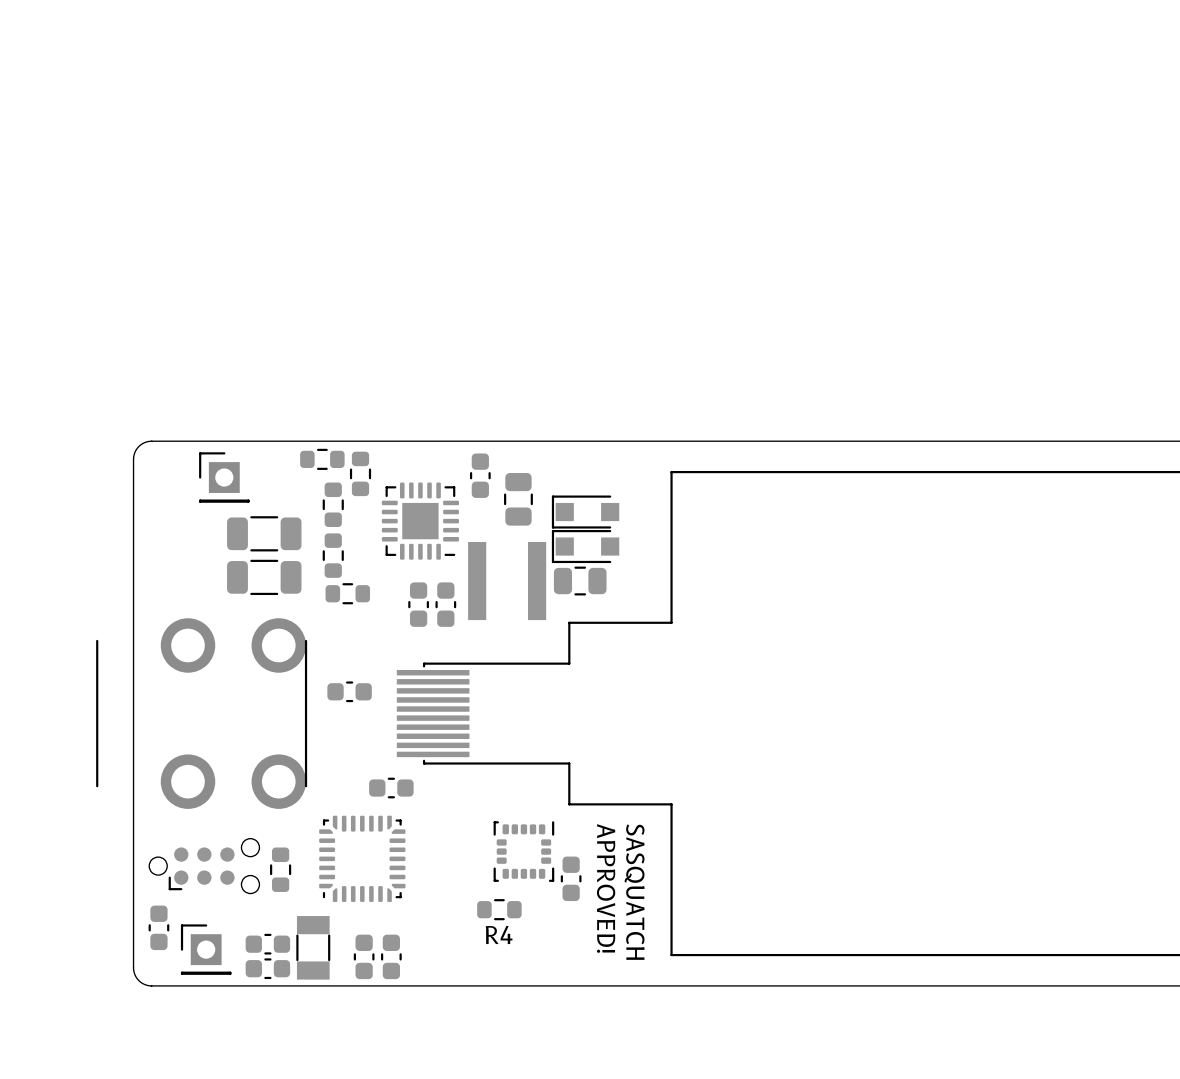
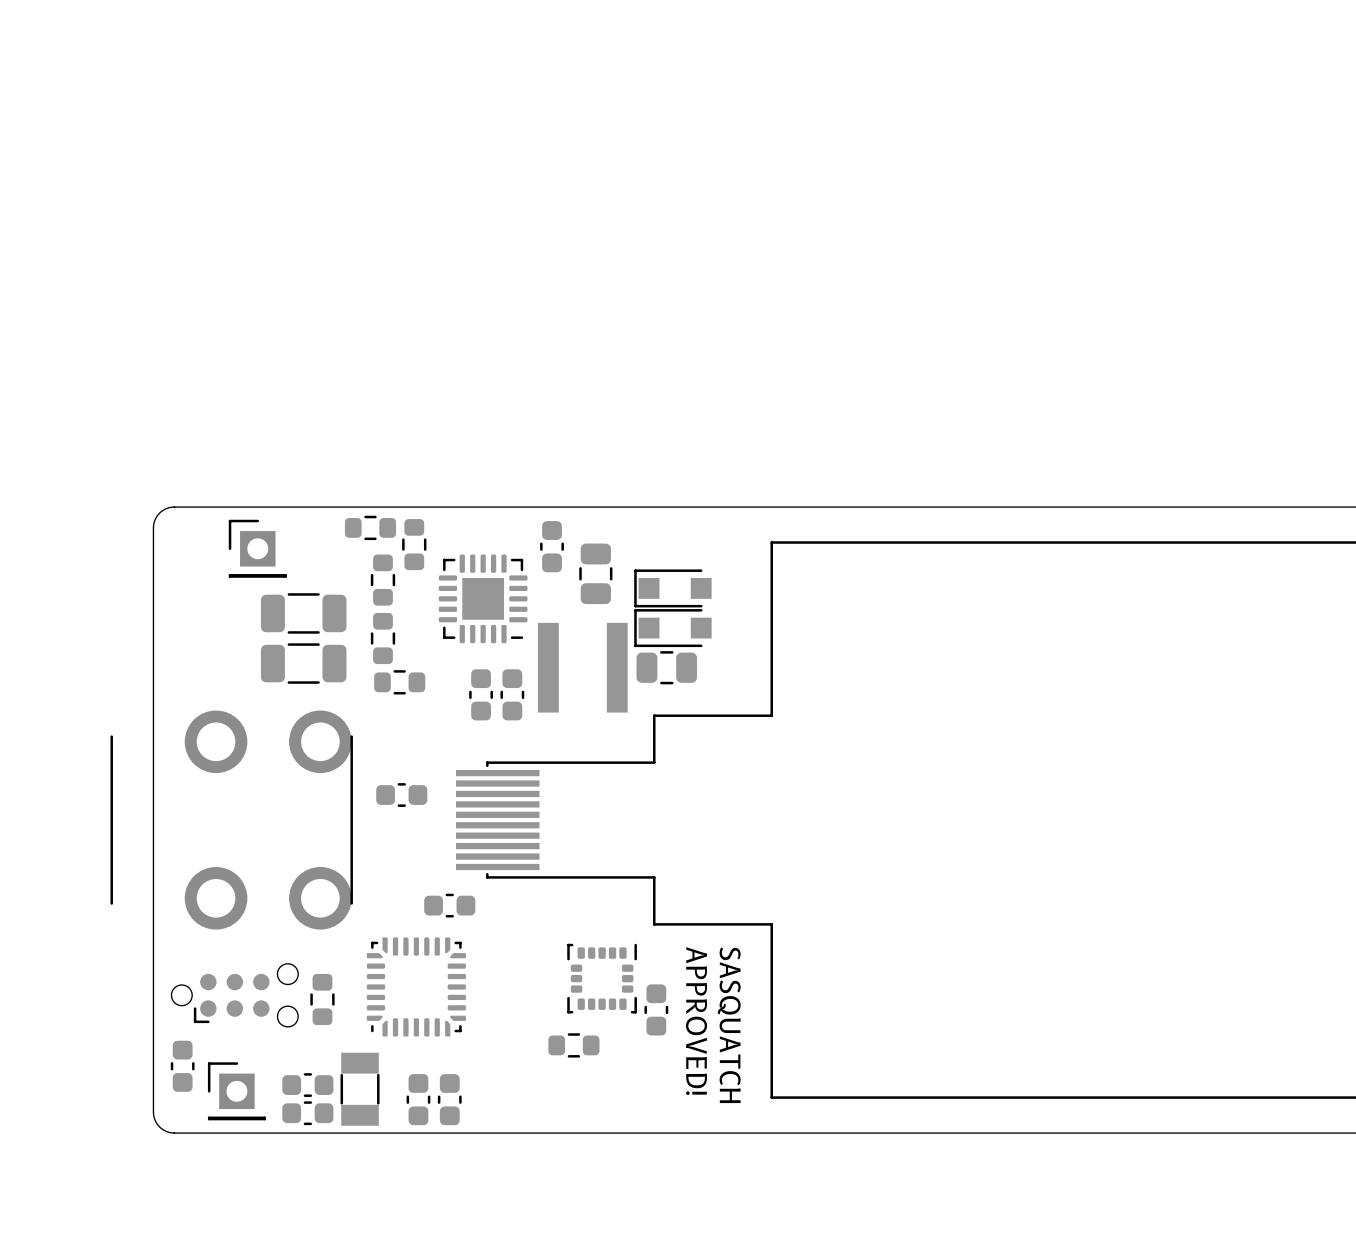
R4 name: R4 (499, 934) -> none

